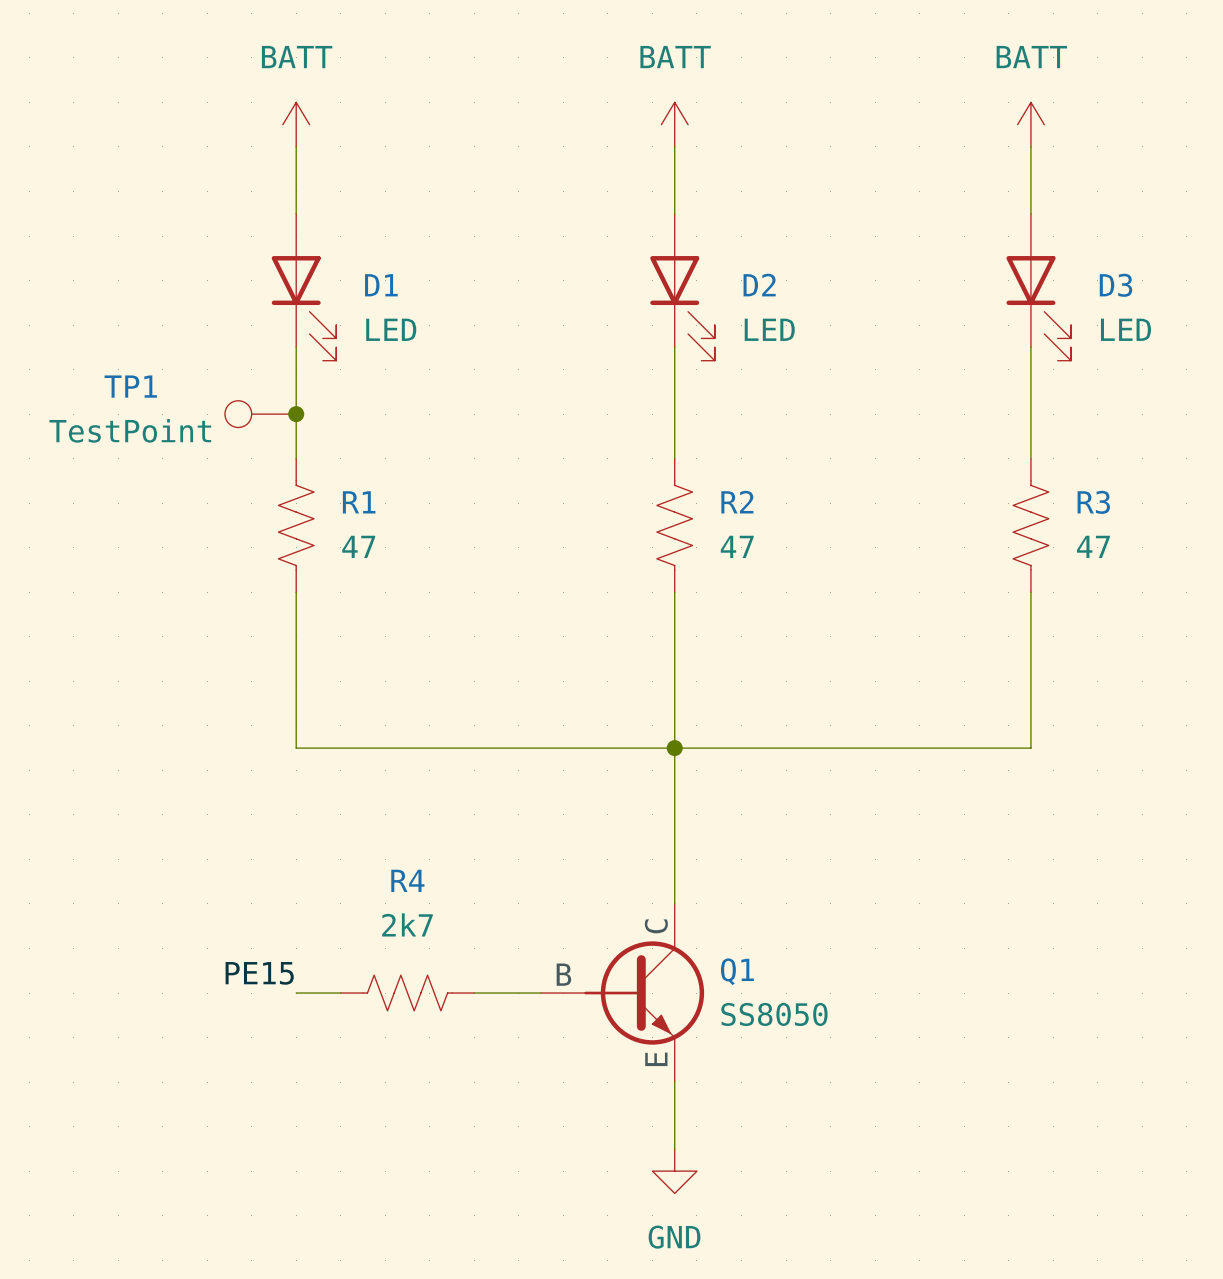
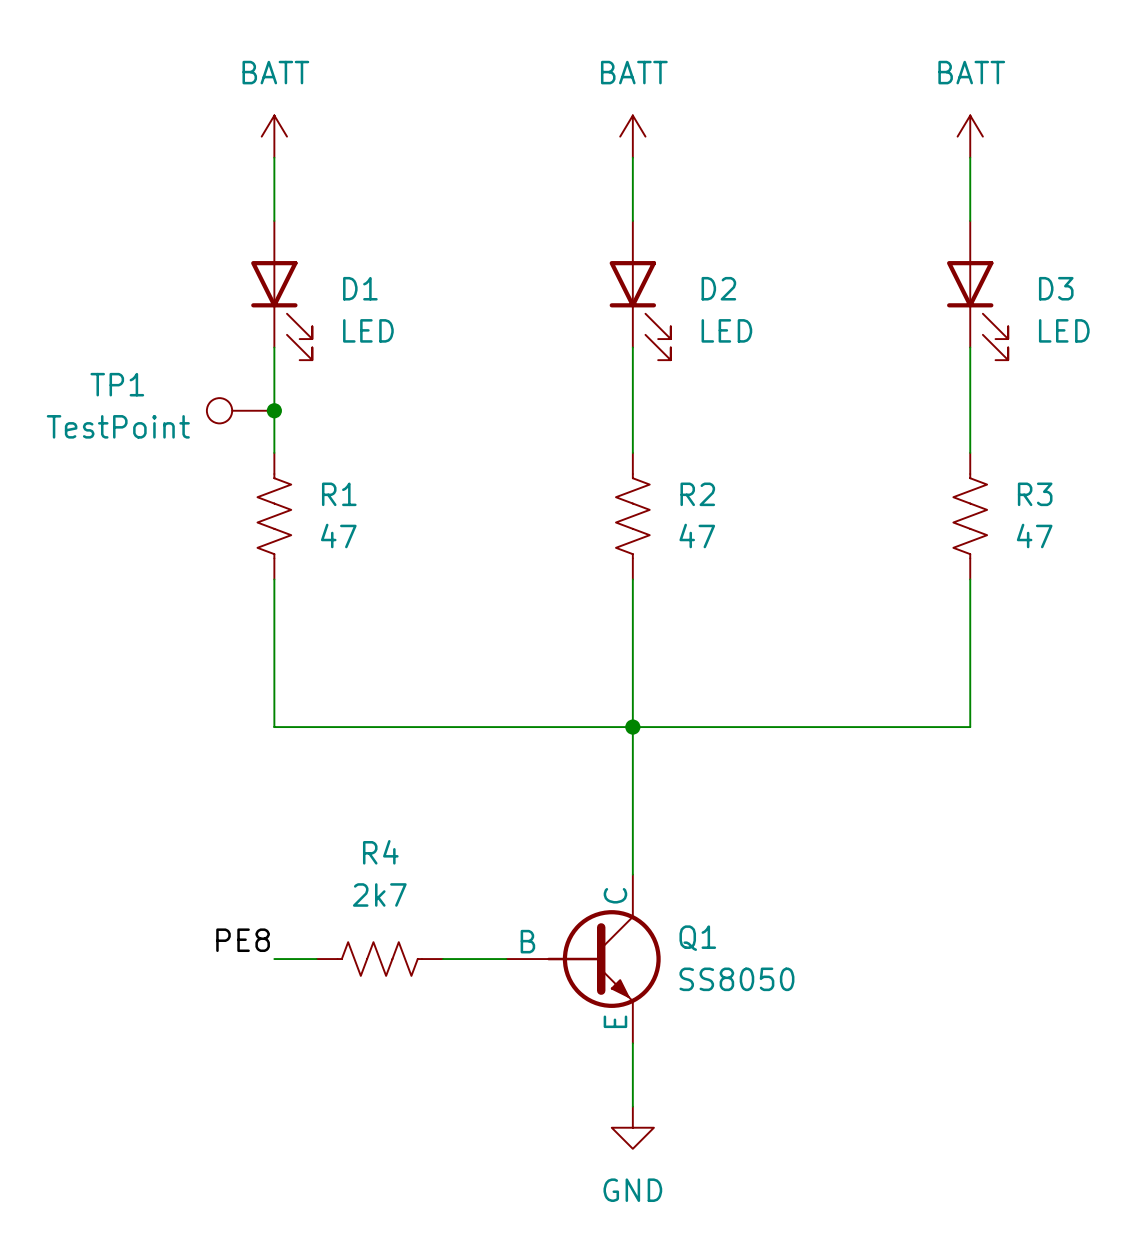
label: PE15 (259, 973) -> PE8 (243, 940)

